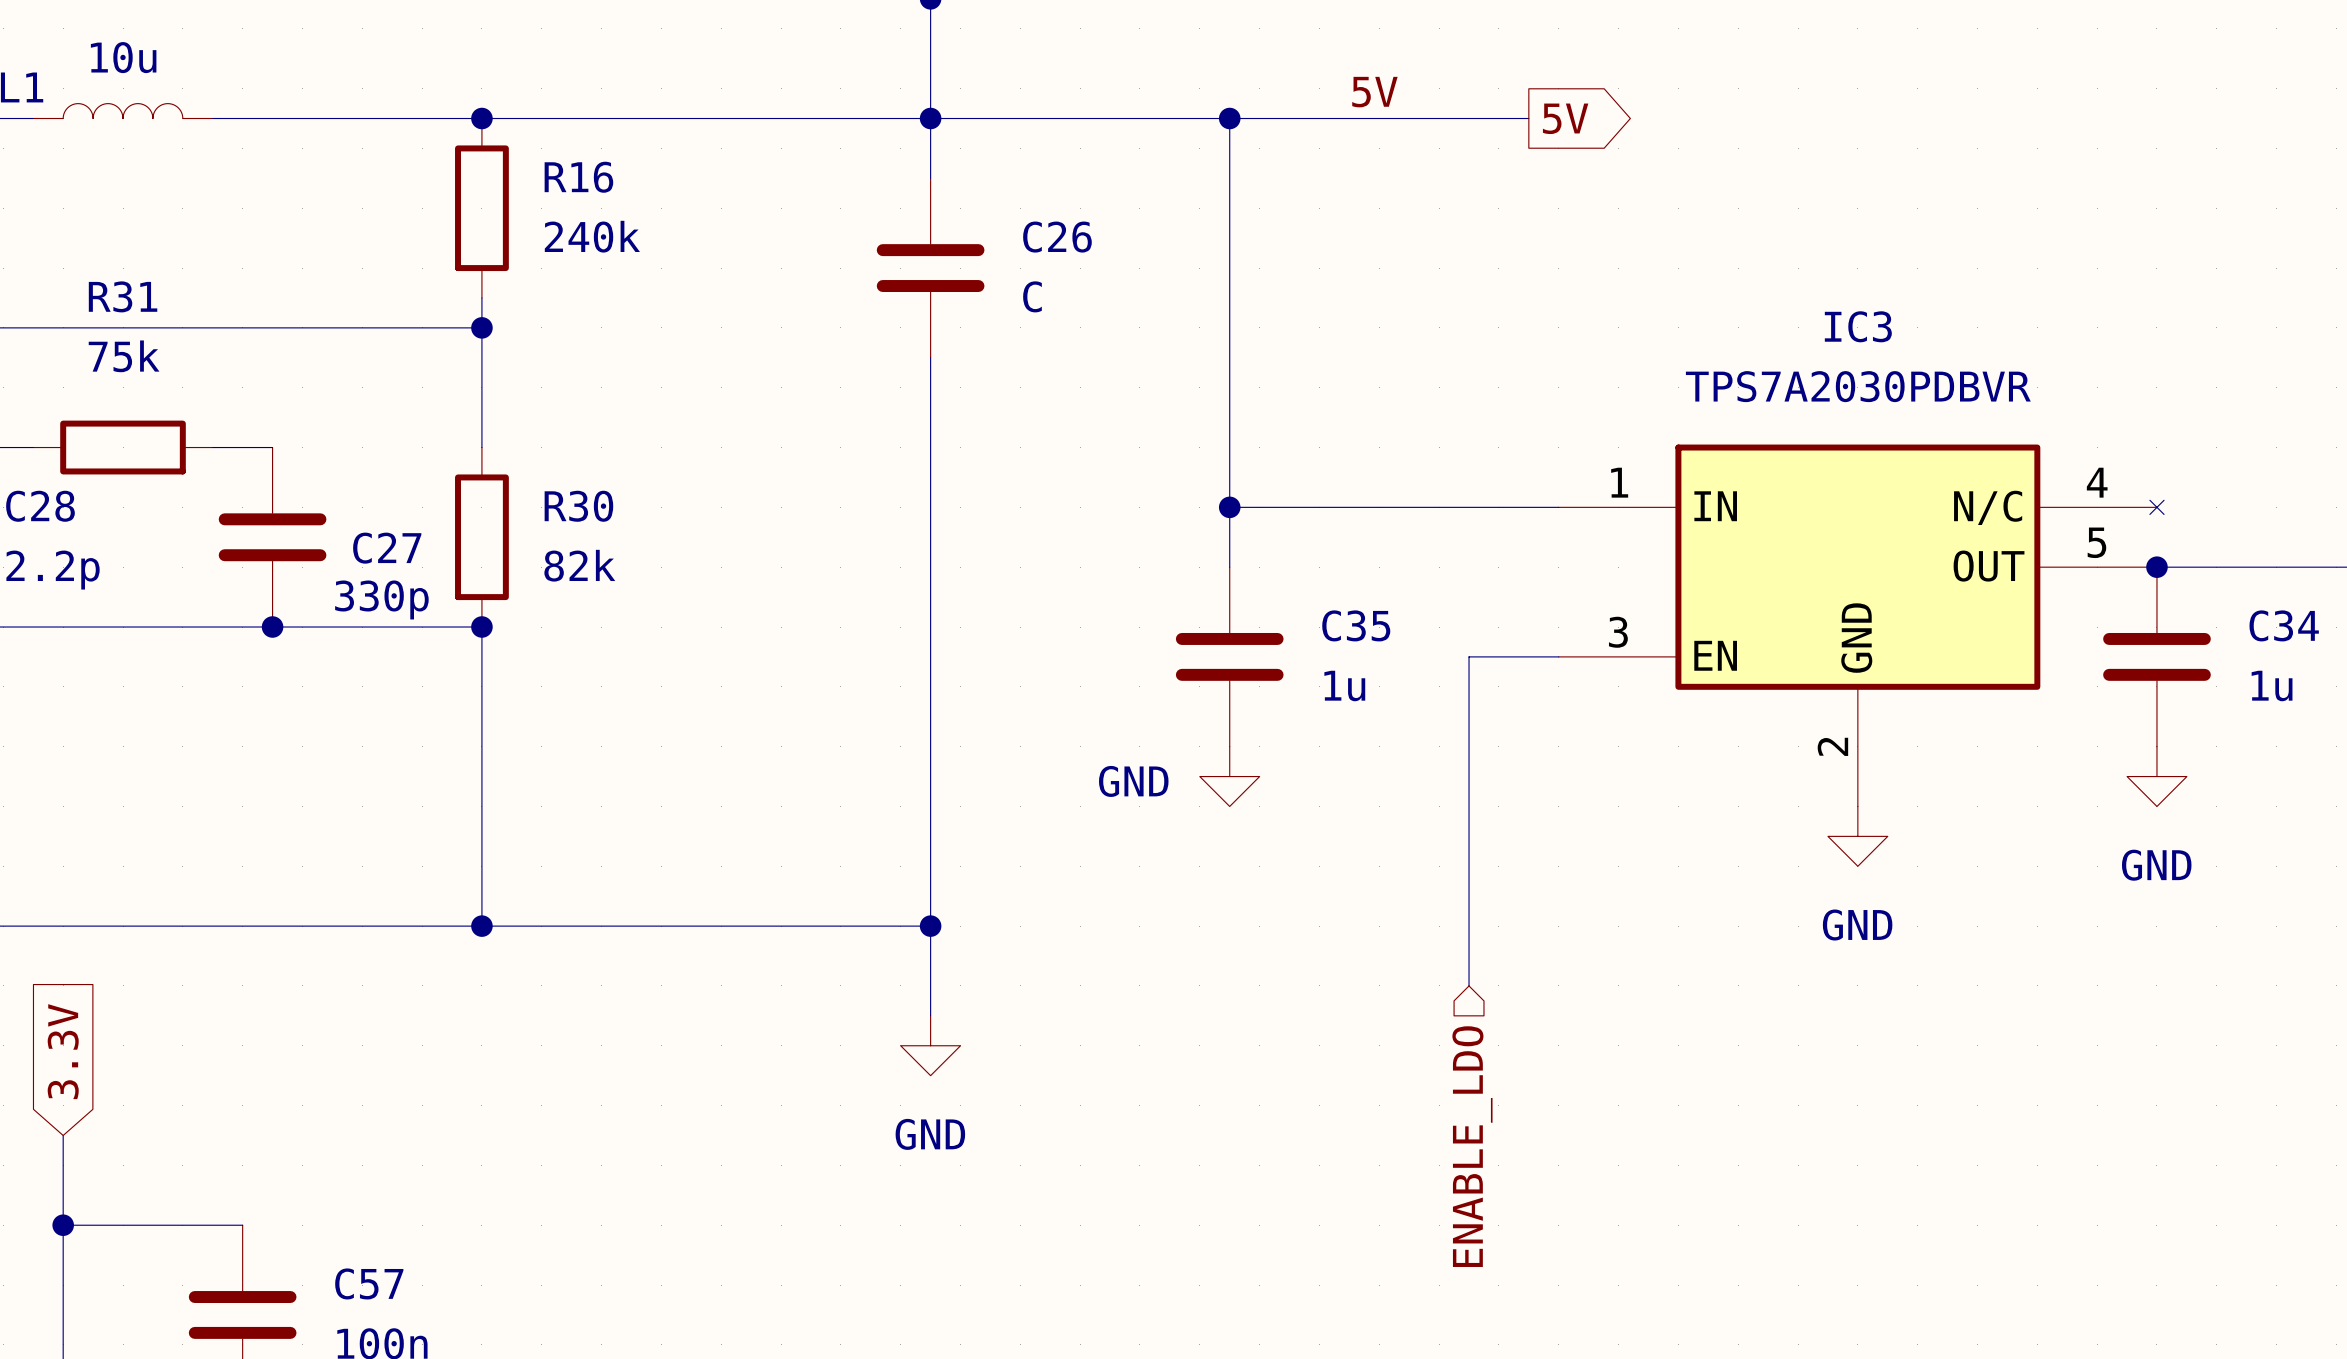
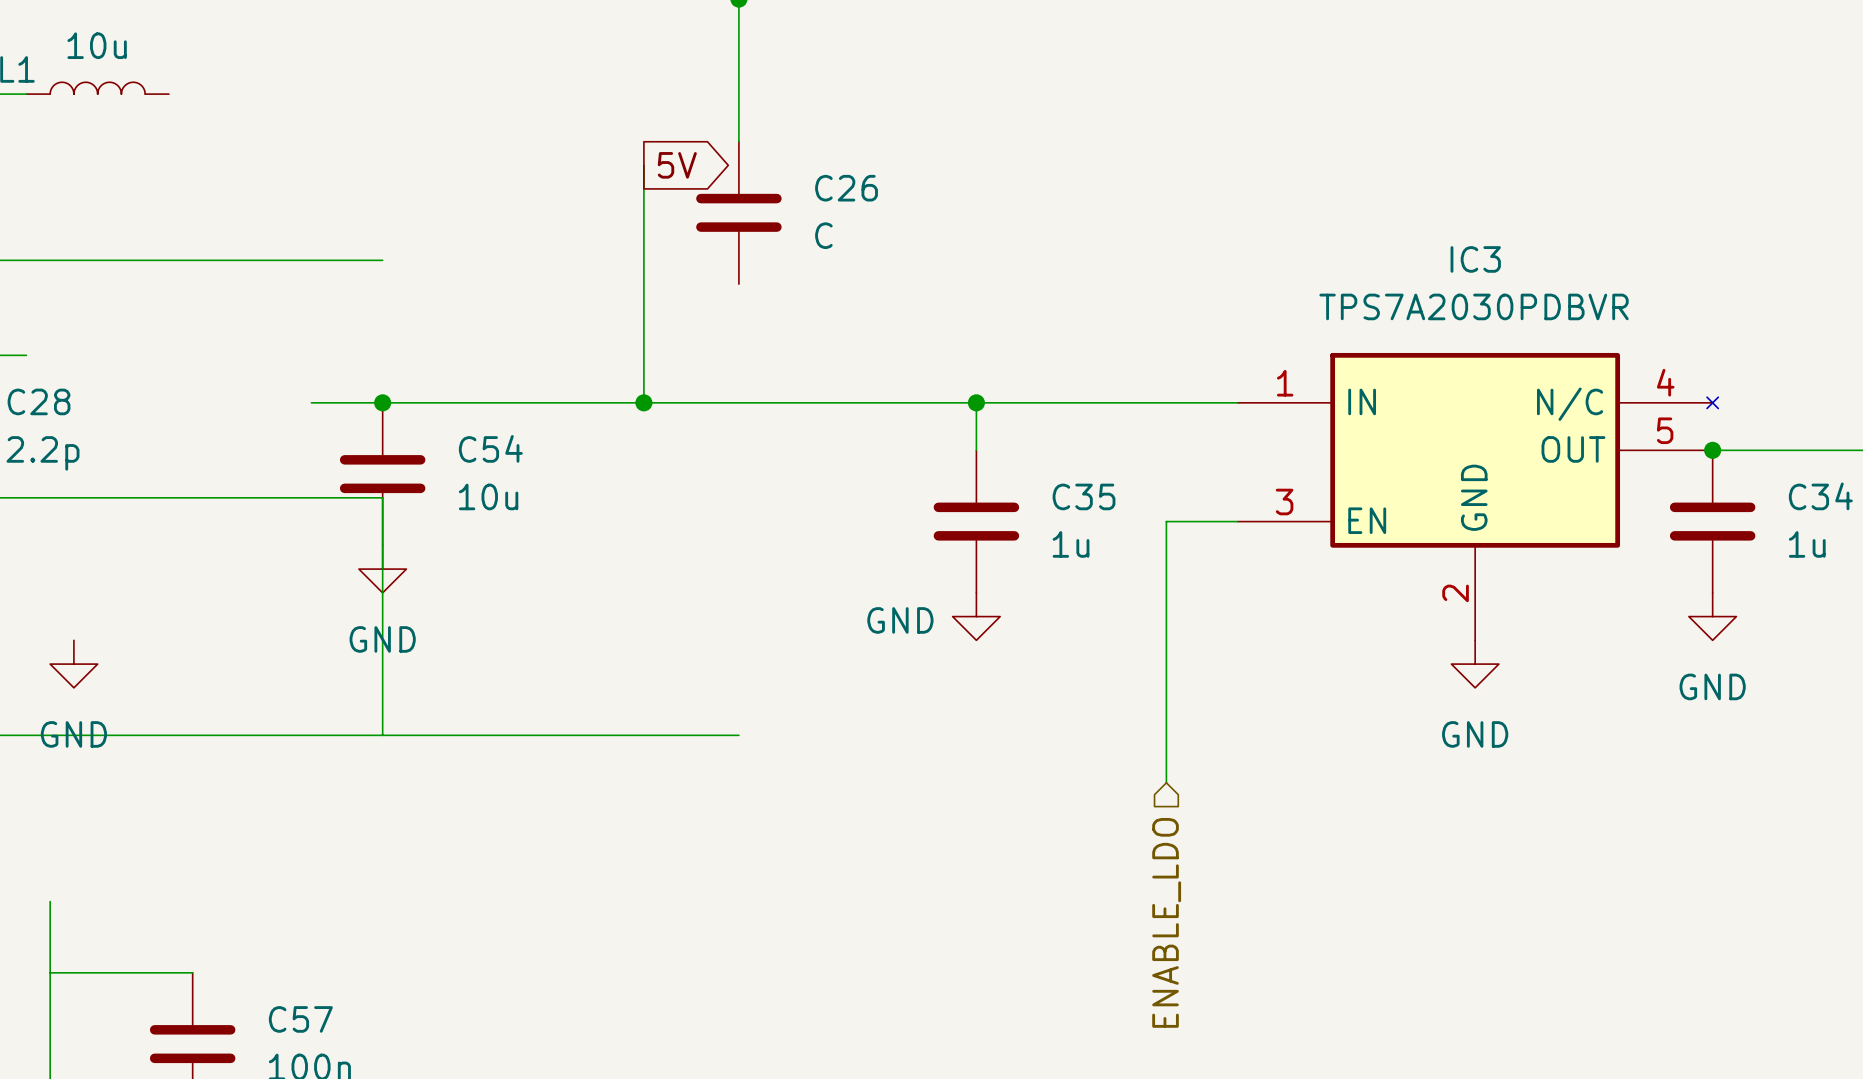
label: 5V (1374, 92) -> none
wire: (212, 118) (1528, 118) -> none
junction: (481, 118) -> none
junction: (930, 118) -> none
wire: (1229, 118) (1229, 507) -> (311, 402) (976, 402)
junction: (1229, 118) -> none
global label: 5V (1565, 118) -> none
R16: 240k (481, 208) -> none
wire: none -> (643, 165) (643, 402)
global label: none -> 5V (677, 165)
wire: (481, 297) (481, 447) -> none
junction: (481, 327) -> none
wire: (930, 357) (930, 1015) -> none
R31: 75k (123, 447) -> none
wire: (212, 447) (272, 447) -> none
junction: none -> (382, 402)
junction: none -> (643, 402)
C27: 330p (272, 537) -> none
R30: 82k (481, 537) -> none
C54: none -> 10u (382, 474)
junction: (272, 627) -> none
junction: (481, 627) -> none
power symbol: none -> GND (382, 569)
power symbol: none -> GND (73, 664)
junction: (481, 926) -> none
junction: (930, 926) -> none
power symbol: GND (930, 1045) -> none
global label: 3.3V (63, 1051) -> none
junction: (63, 1225) -> none

